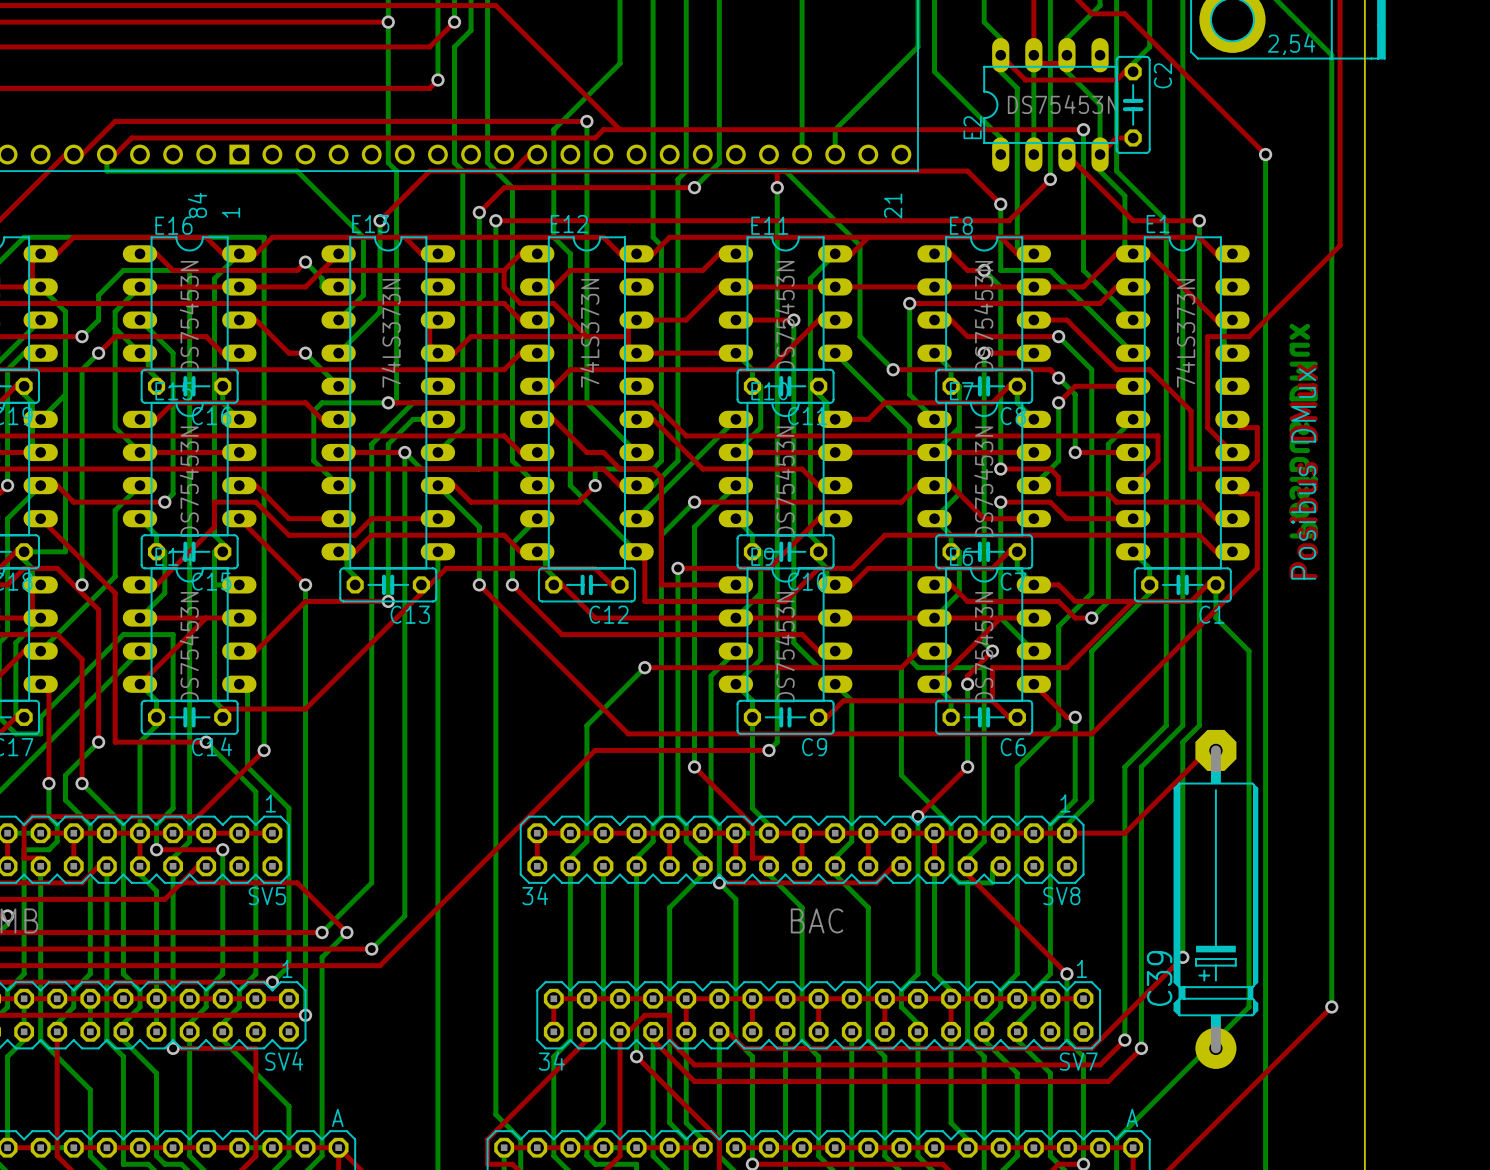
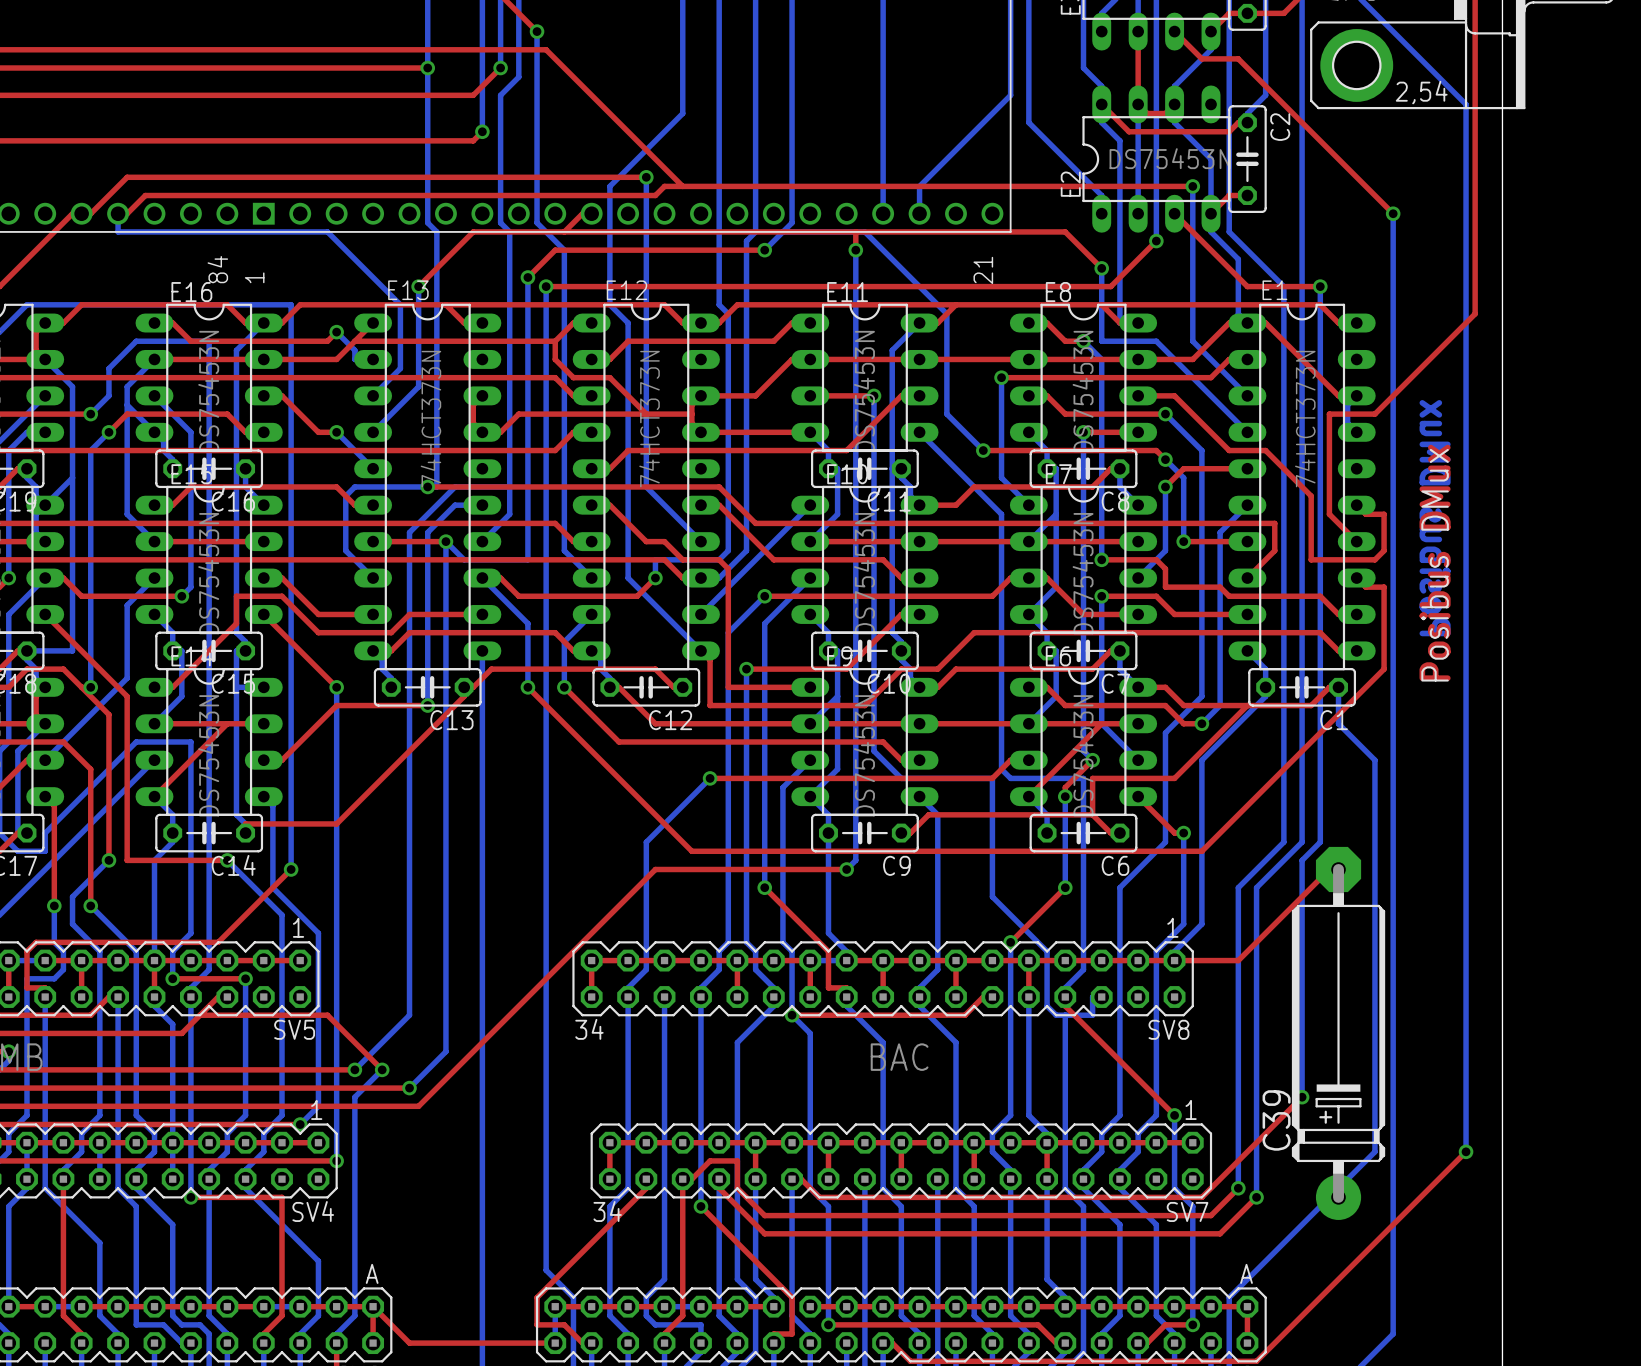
E13 value: 74LS373N (391, 333) -> 74HCT373N (430, 419)
E12 value: 74LS373N (589, 333) -> 74HCT373N (649, 419)
E1 value: 74LS373N (1185, 333) -> 74HCT373N (1305, 419)

